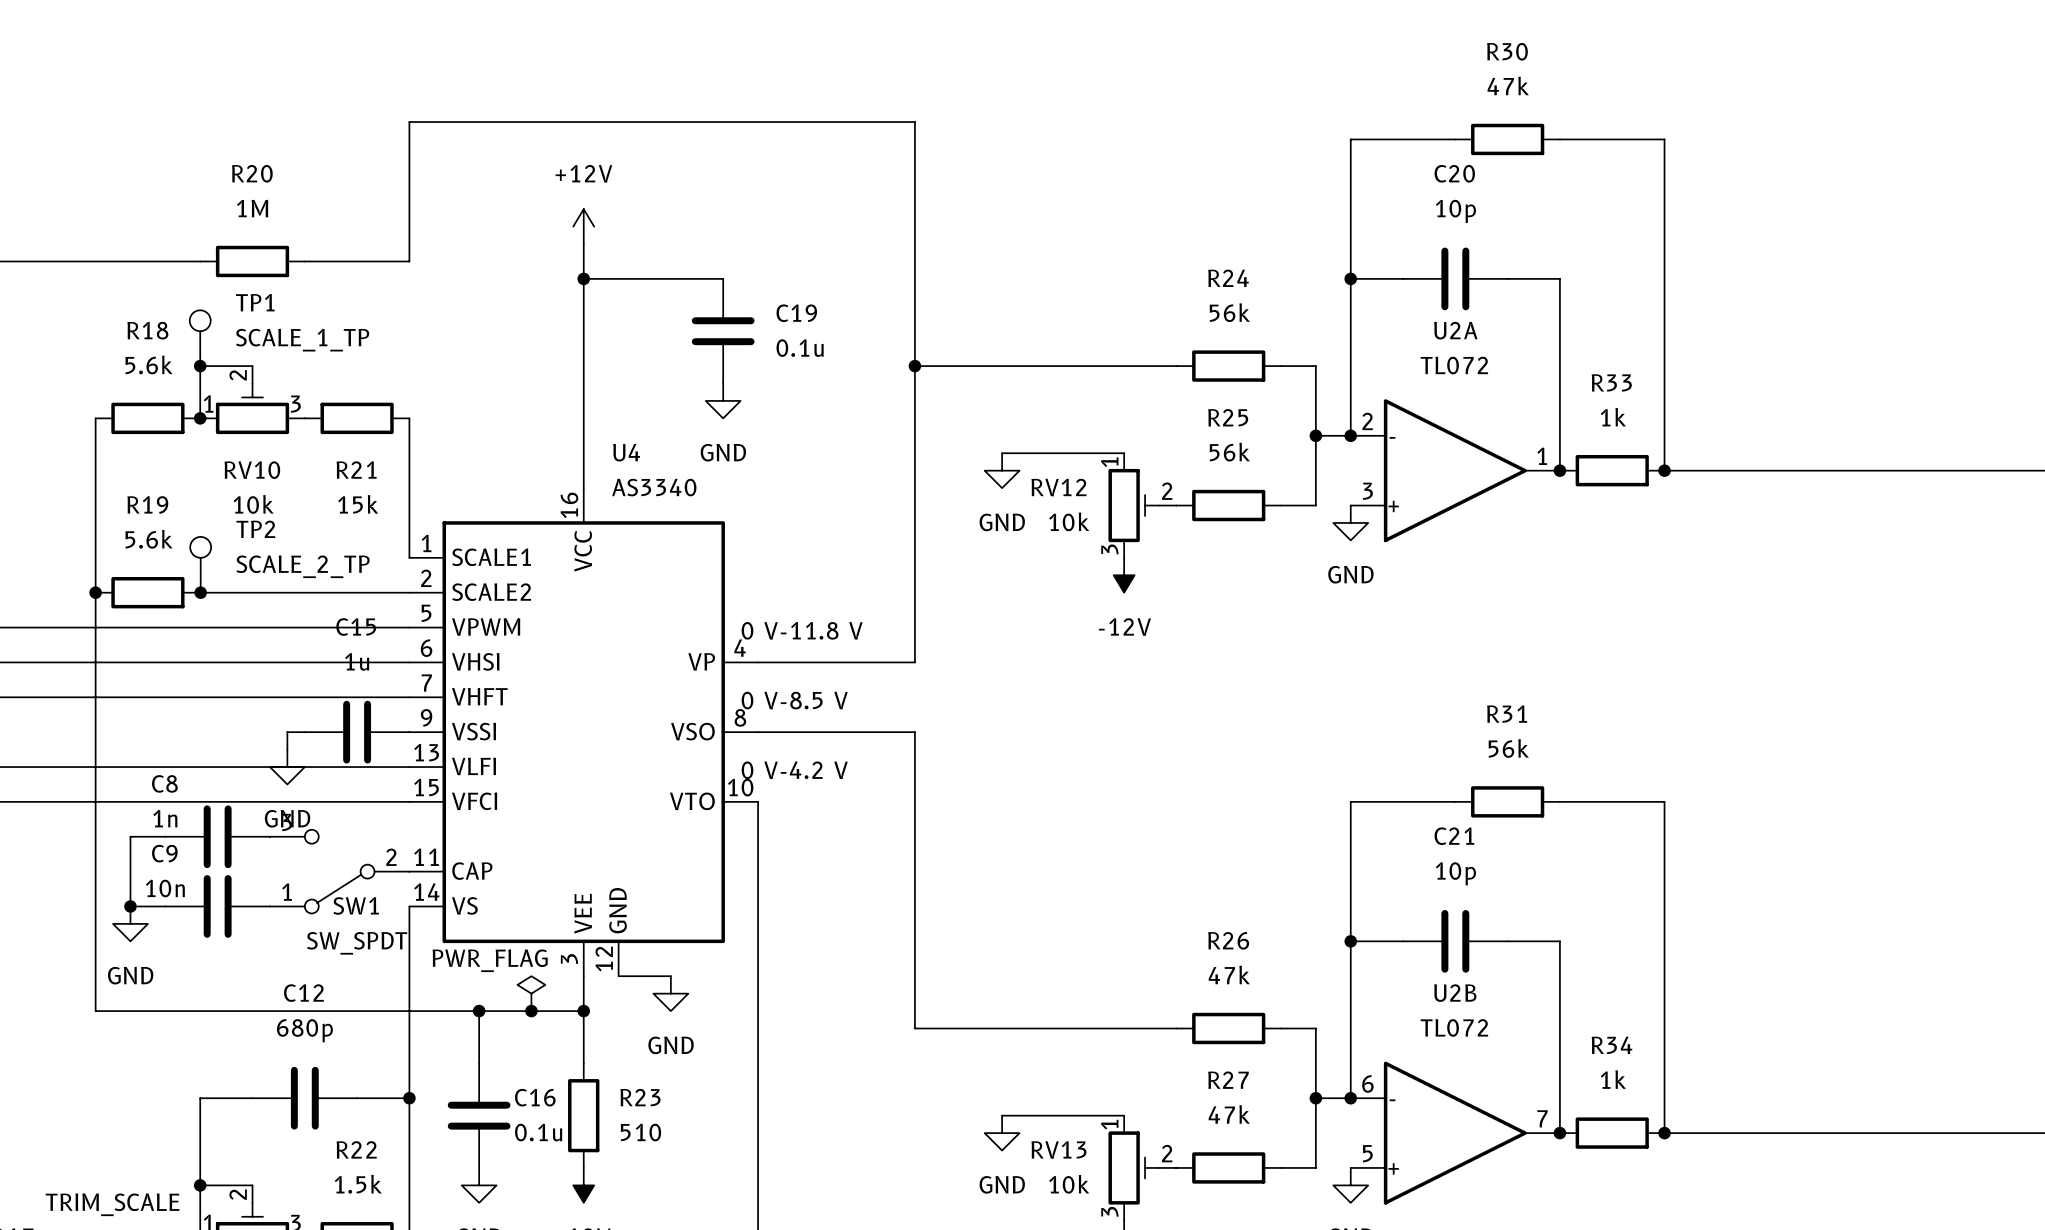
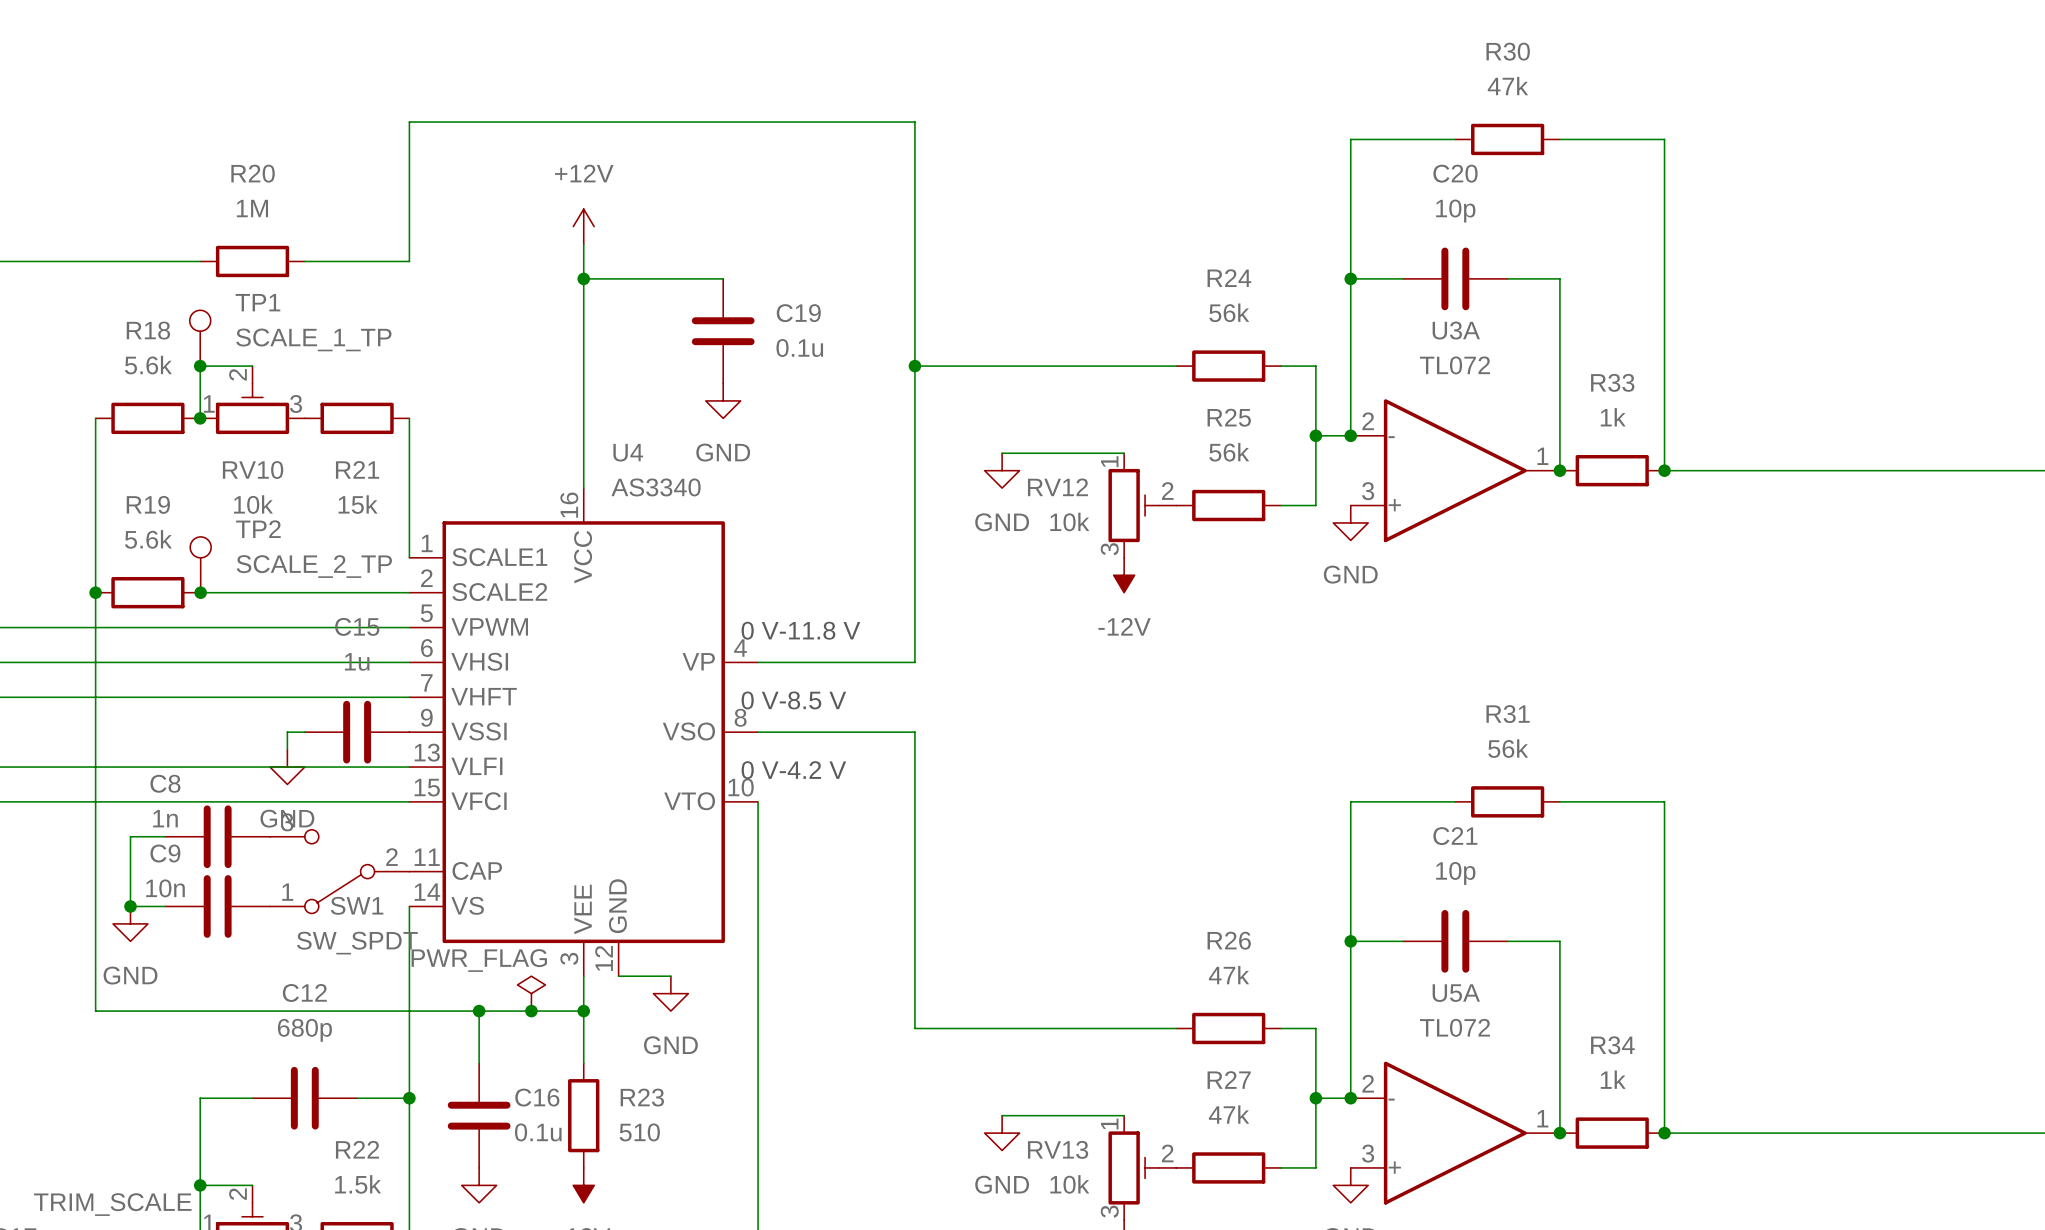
U2A name: U2A (1455, 330) -> U3A (1456, 330)
U2B name: U2B (1455, 993) -> U5A (1456, 993)
U2B pin number: 6 (1367, 1083) -> 2 (1368, 1083)
U2B pin number: 7 (1542, 1118) -> 1 (1542, 1118)
U2B pin number: 5 (1367, 1153) -> 3 (1368, 1153)

